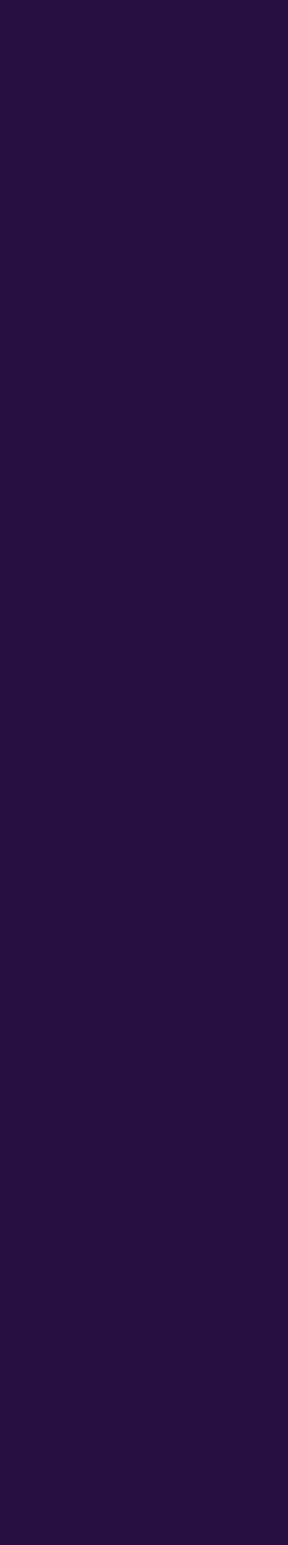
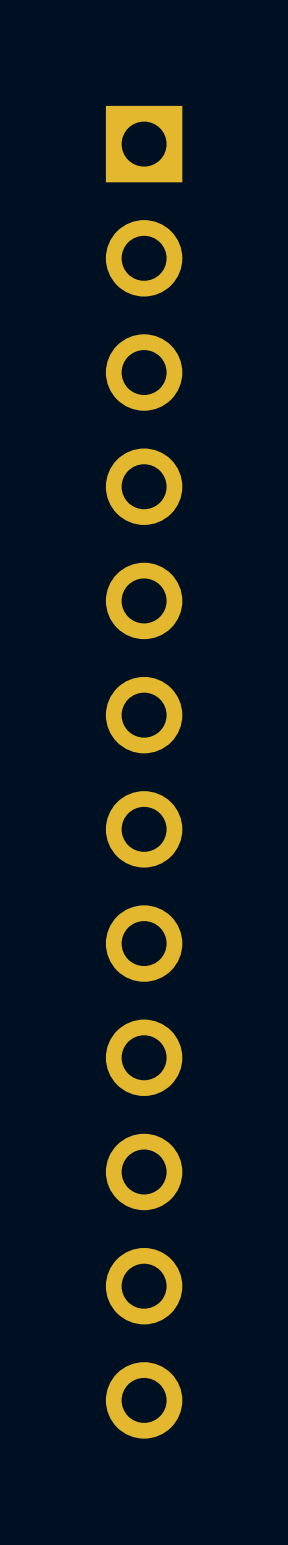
part: none -> (144, 772)

